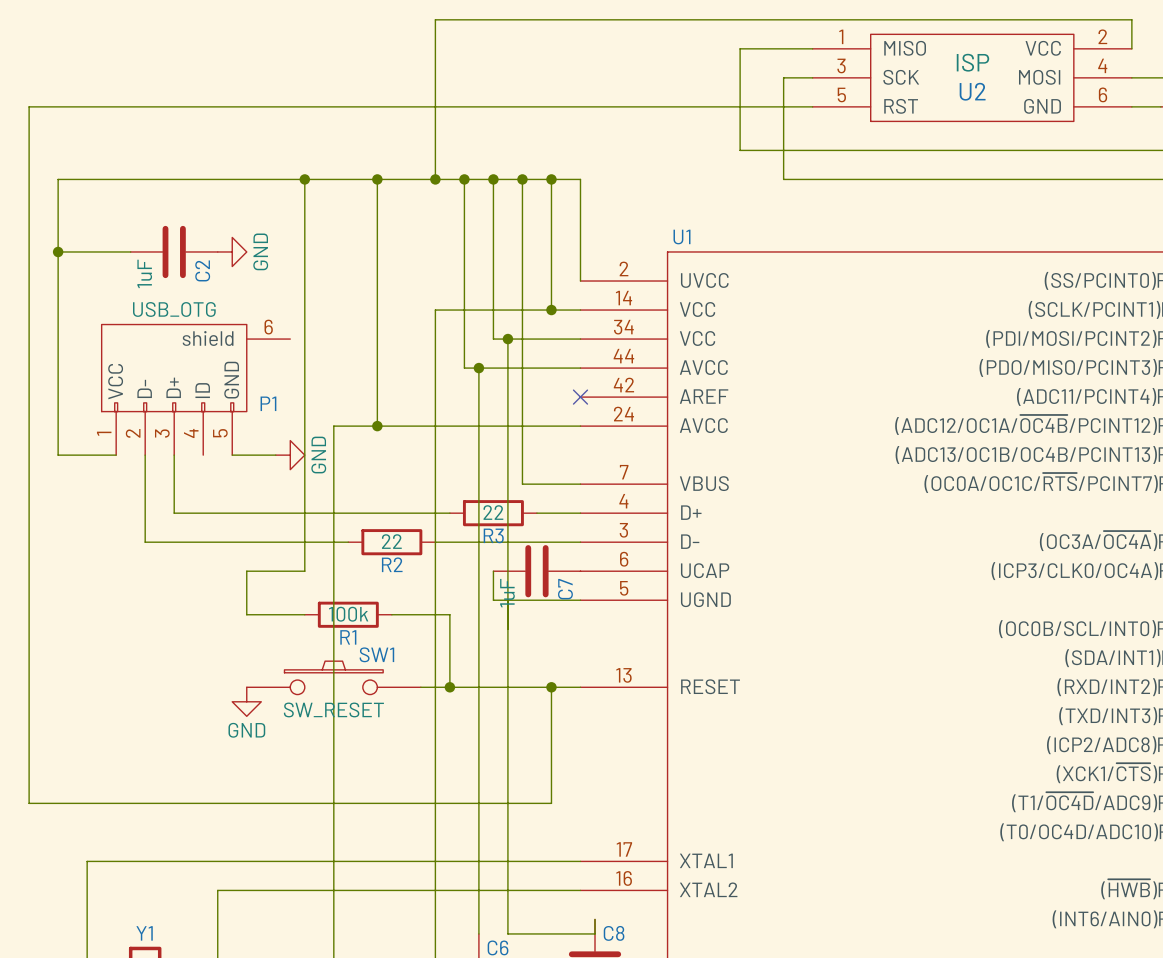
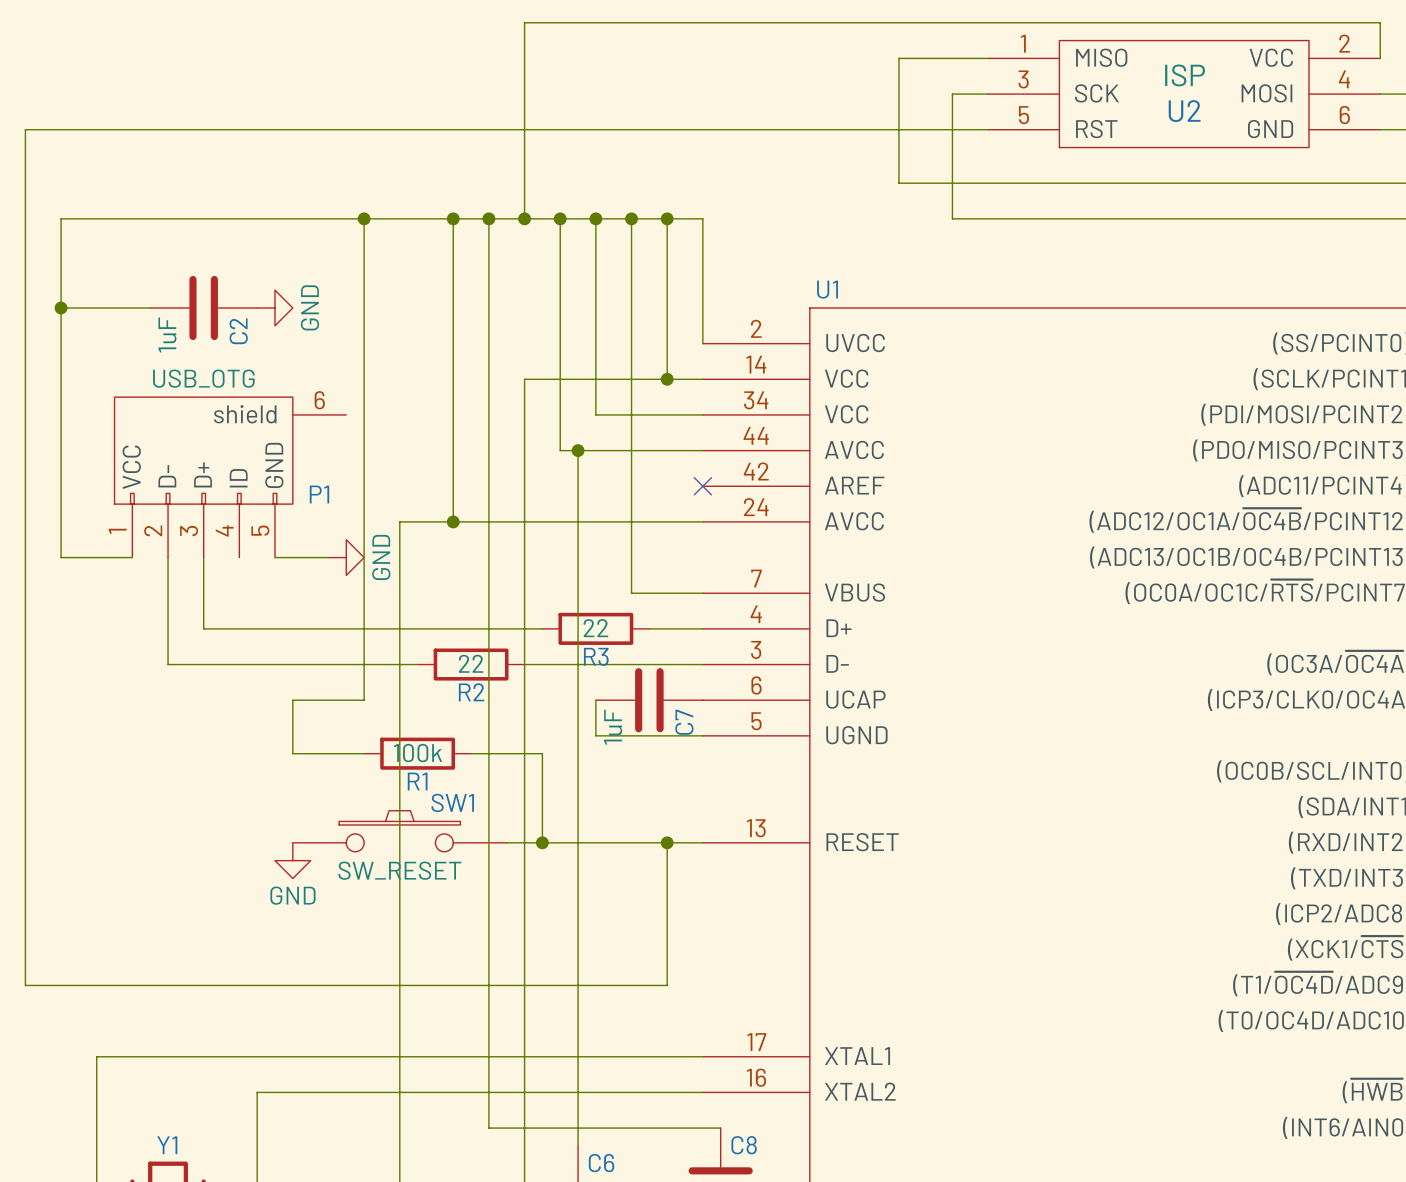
junction: none -> (488, 218)
wire: (507, 339) (507, 933) (595, 933) (595, 919) -> (488, 218) (488, 1128) (720, 1128)
junction: (507, 339) -> none

